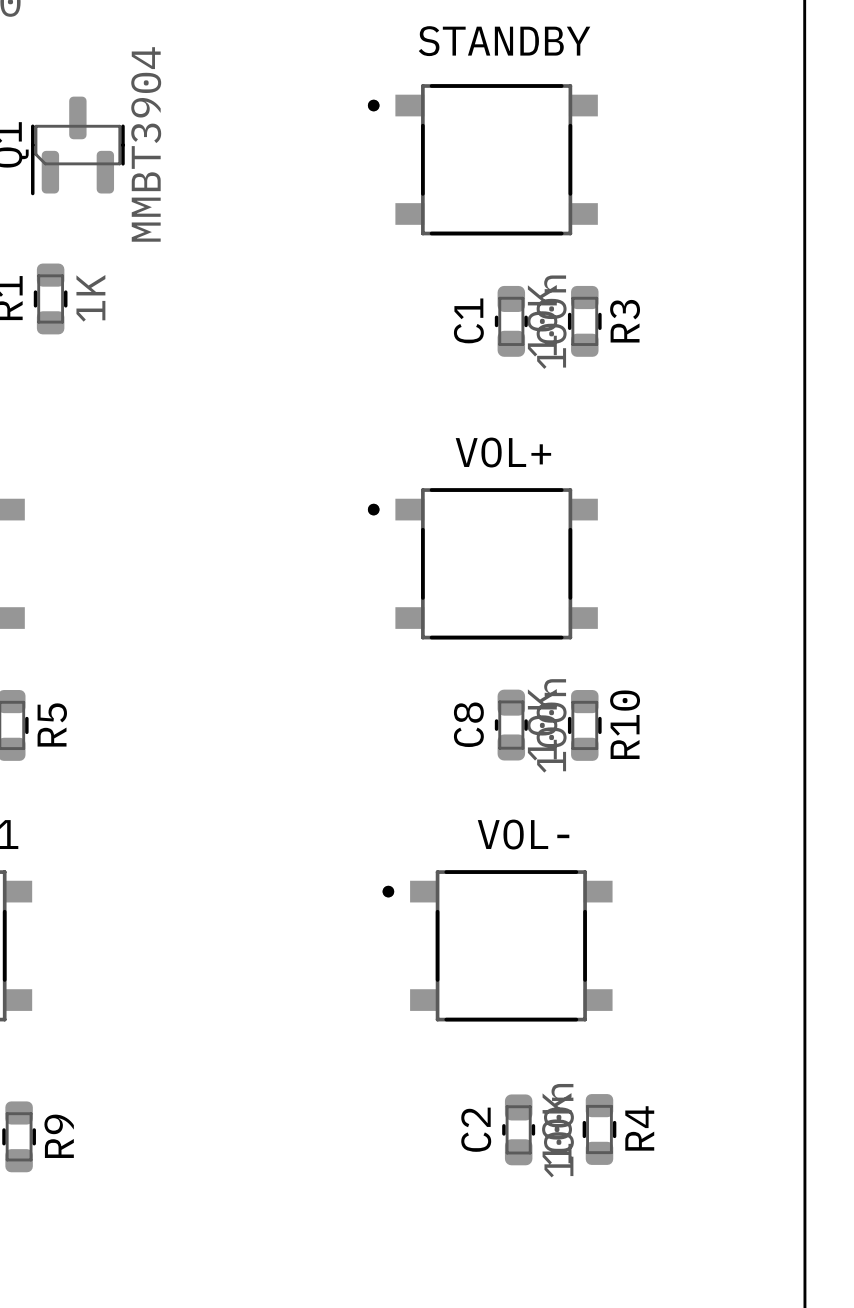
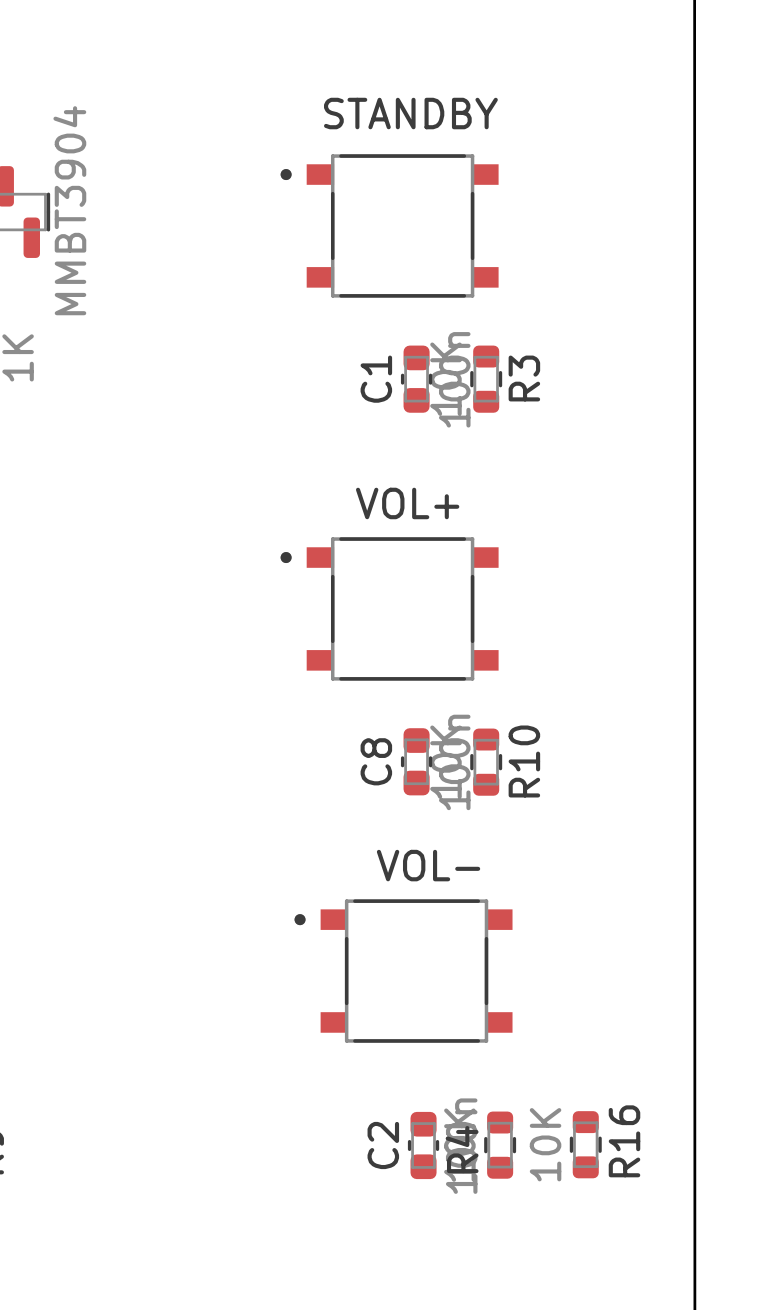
R4 name position: R4 (639, 1128) -> R4 (462, 1149)
R16: none -> 10K (585, 1144)

